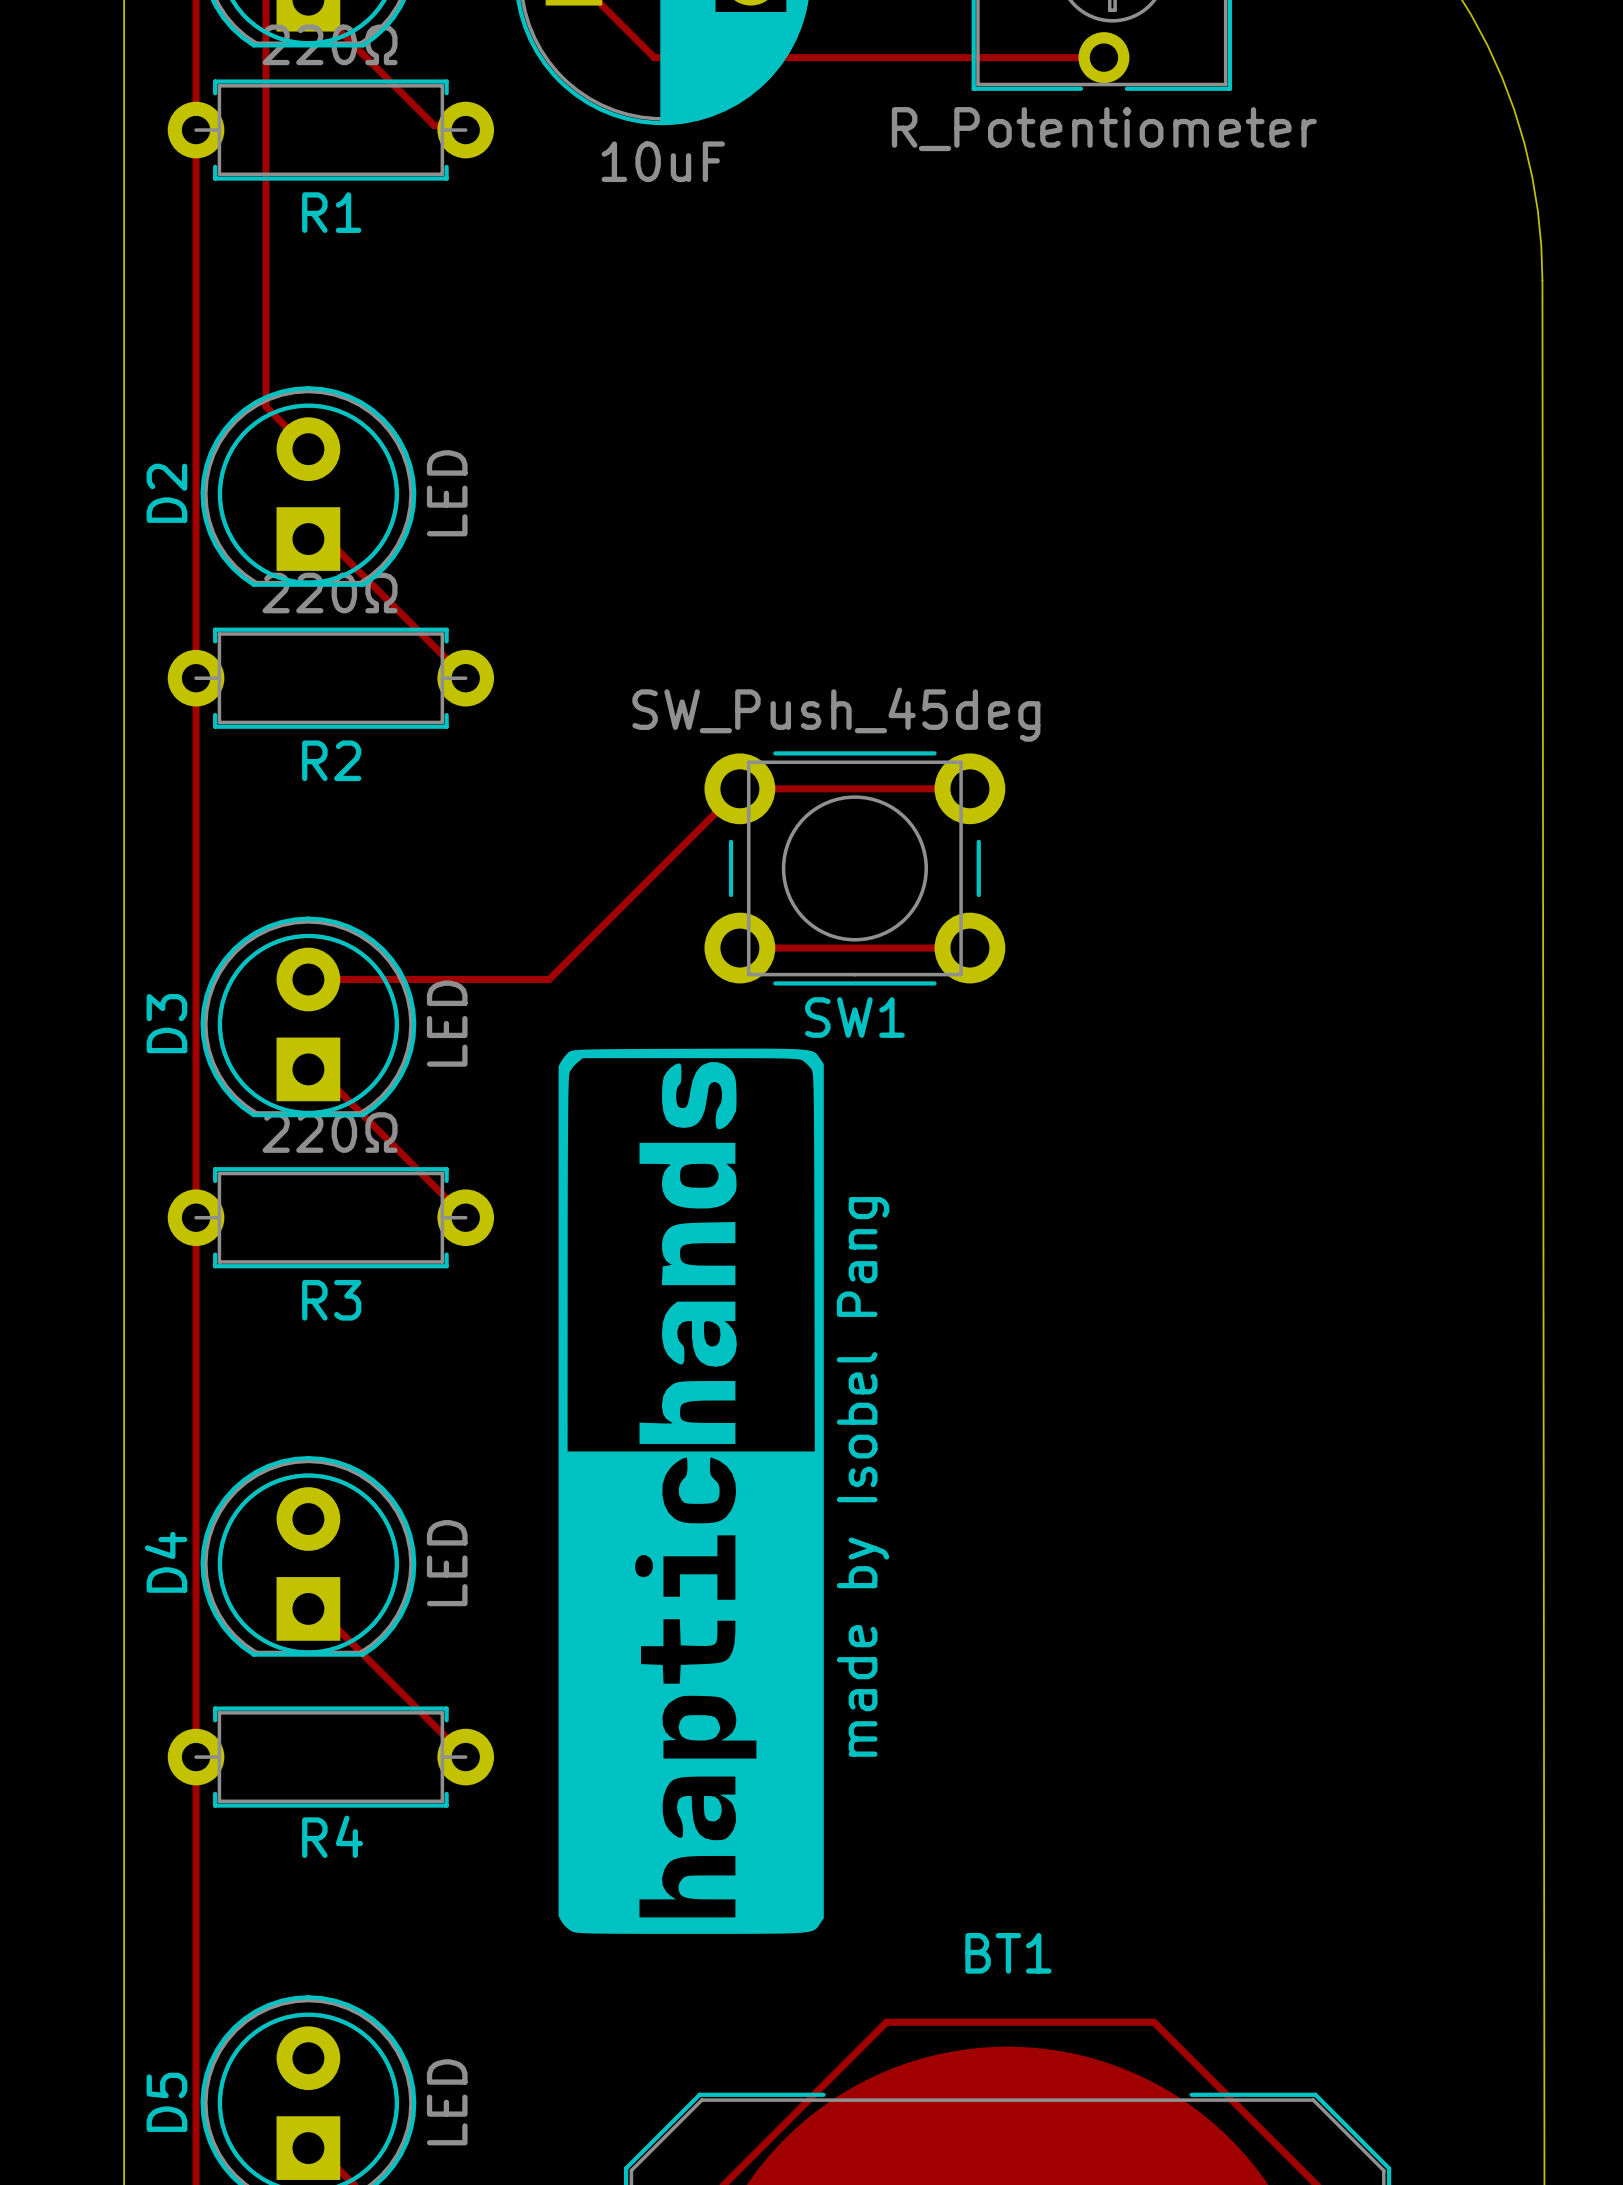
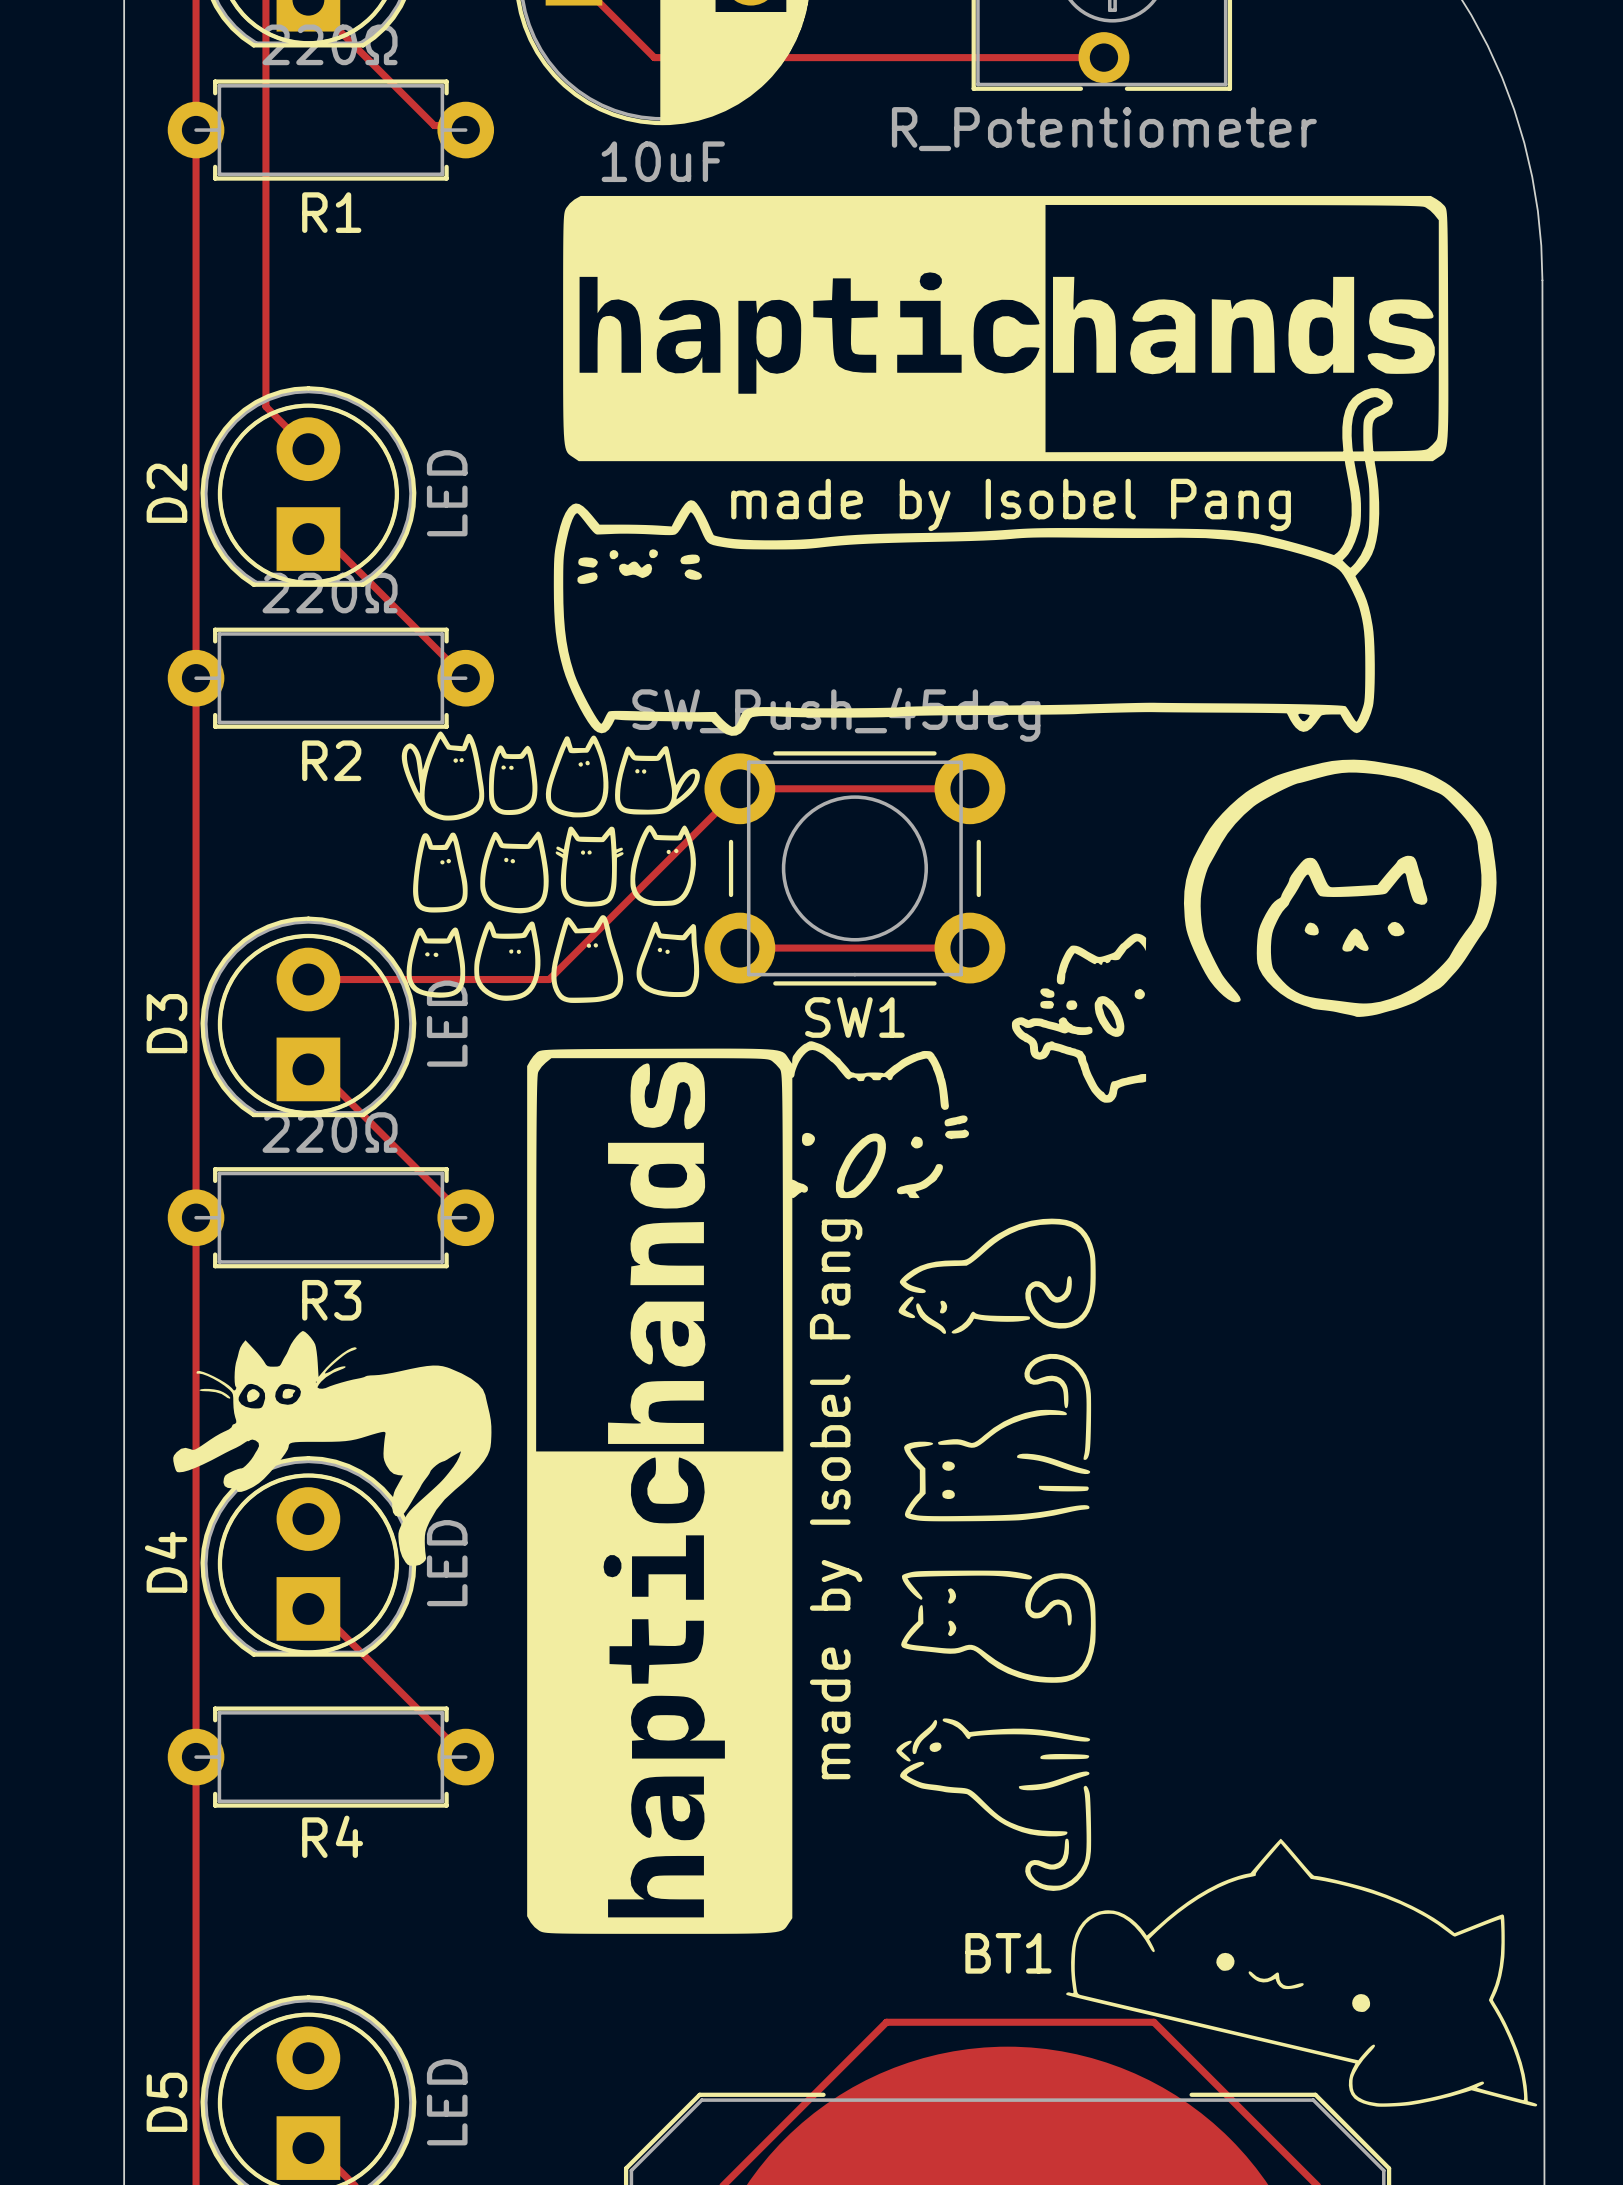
drawing: none -> [401, 195, 1538, 2107]
text: none -> made by Isobel Pang (1011, 504)
drawing: none -> [173, 1331, 492, 1566]
text position: made by Isobel Pang (863, 1476) -> made by Isobel Pang (836, 1499)
drawing position: (691, 1491) -> (659, 1491)

